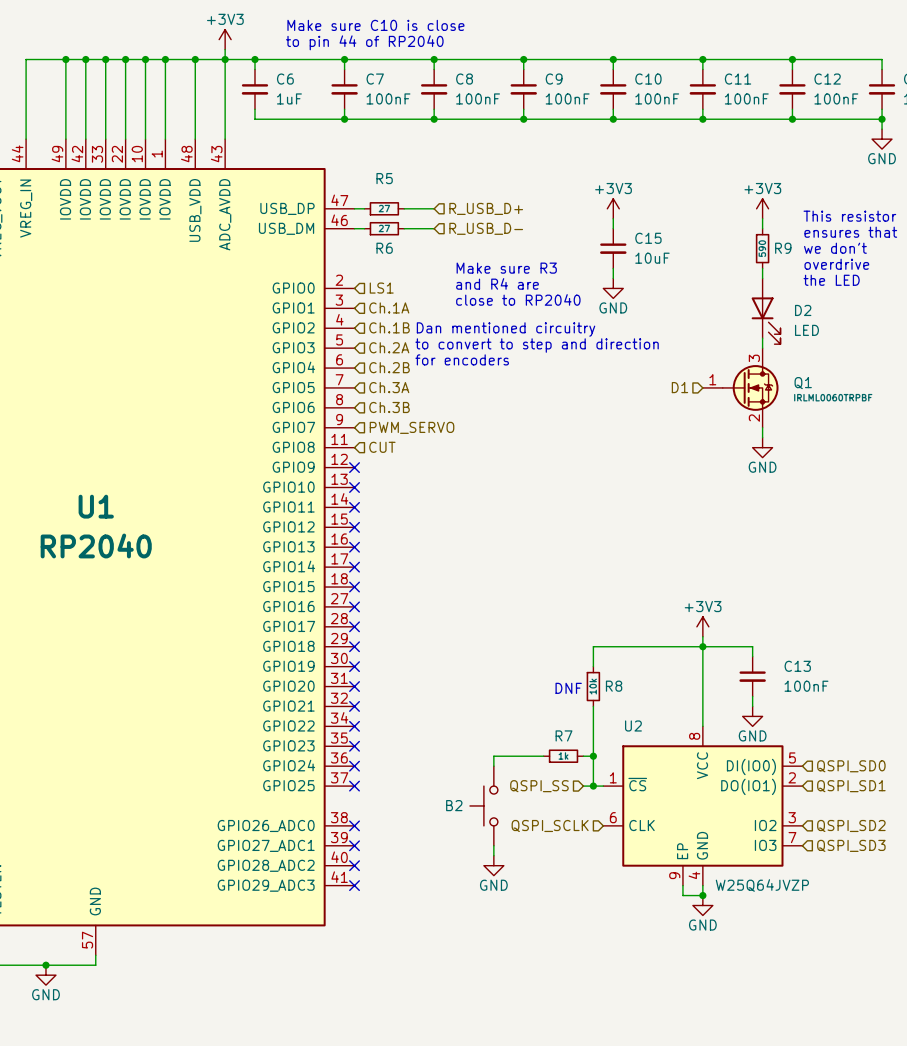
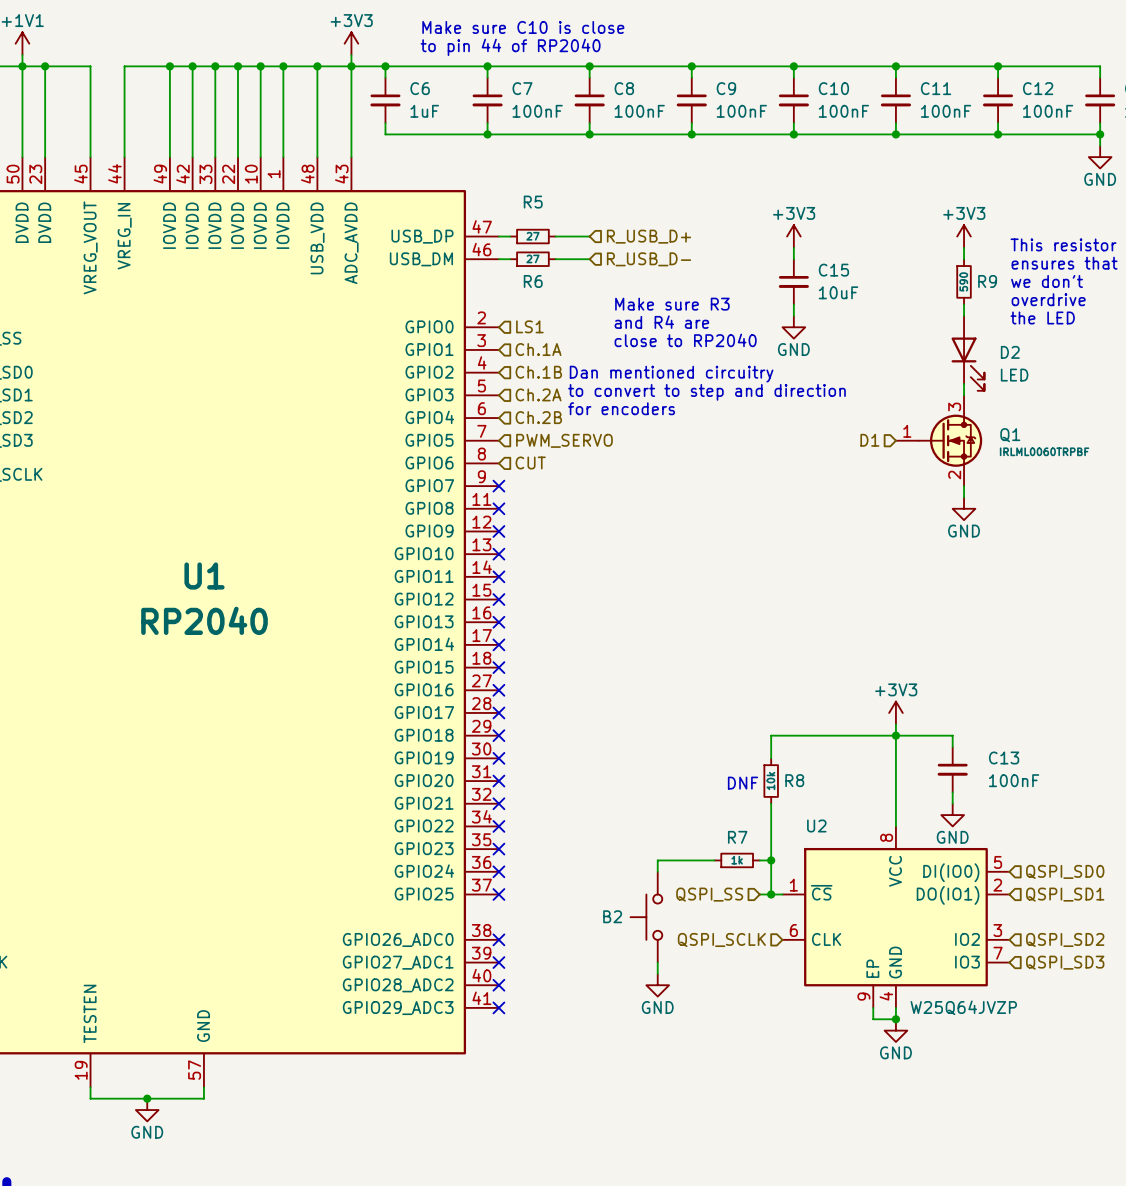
hierarchical label: Ch.3A (389, 387) -> PWM_SERVO (564, 440)
hierarchical label: Ch.3B (389, 407) -> CUT (530, 462)
no-connect mark: none -> (498, 486)
hierarchical label: PWM_SERVO (412, 427) -> none
no-connect mark: none -> (498, 508)
hierarchical label: CUT (382, 447) -> none

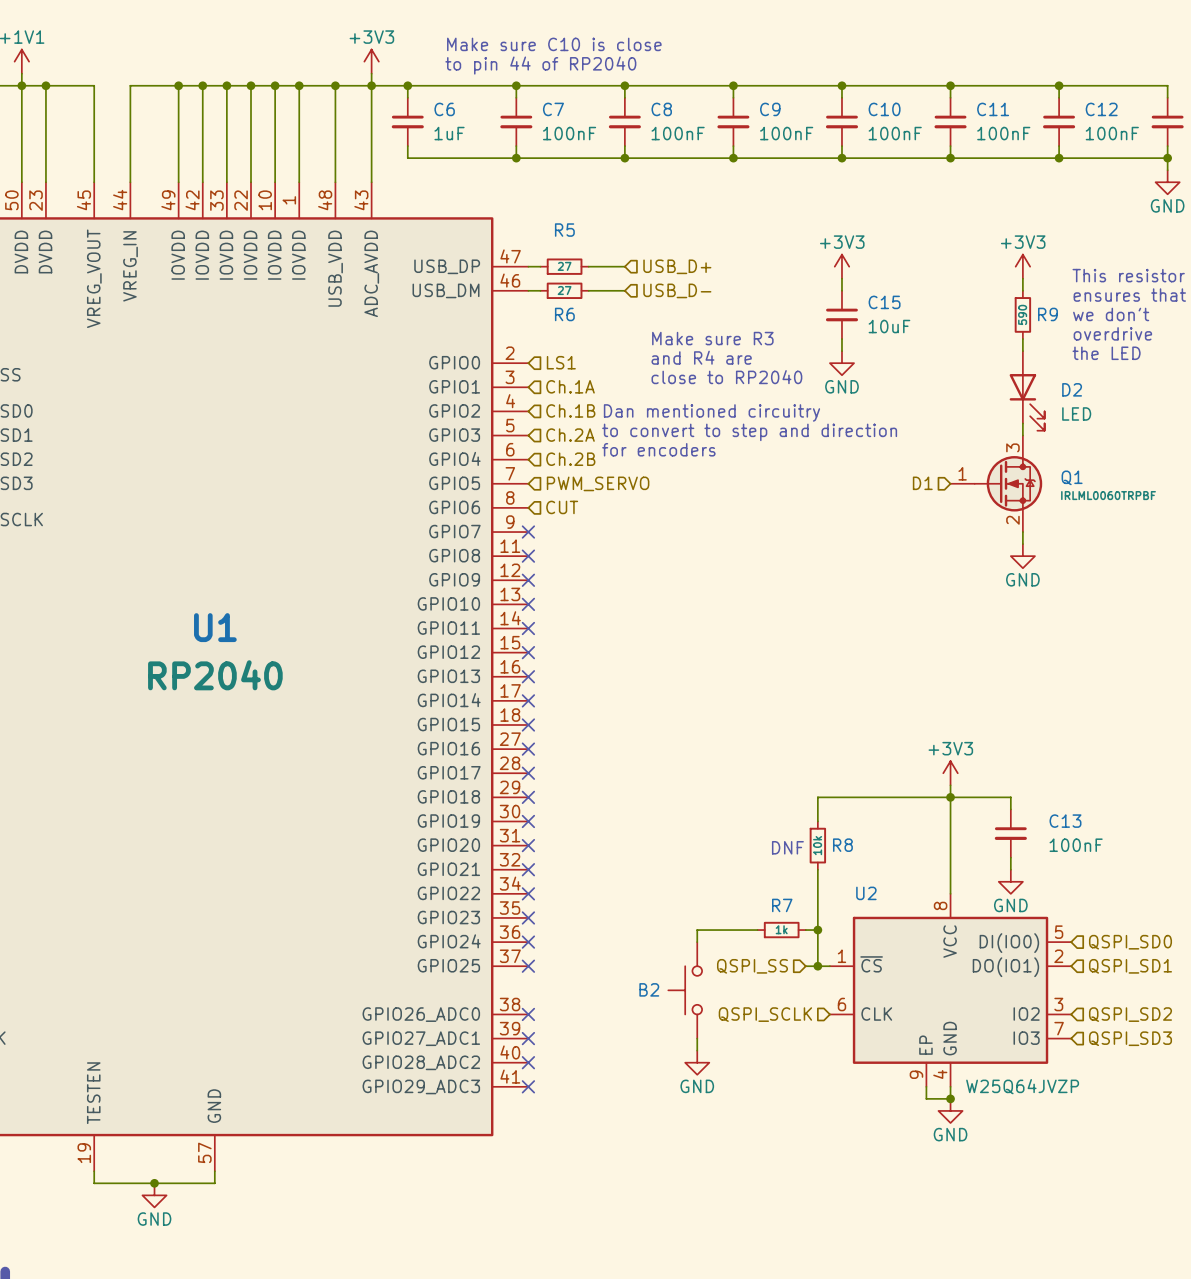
hierarchical label: R_USB_D+ (648, 236) -> USB_D+ (677, 266)
hierarchical label: R_USB_D- (648, 259) -> USB_D- (677, 290)

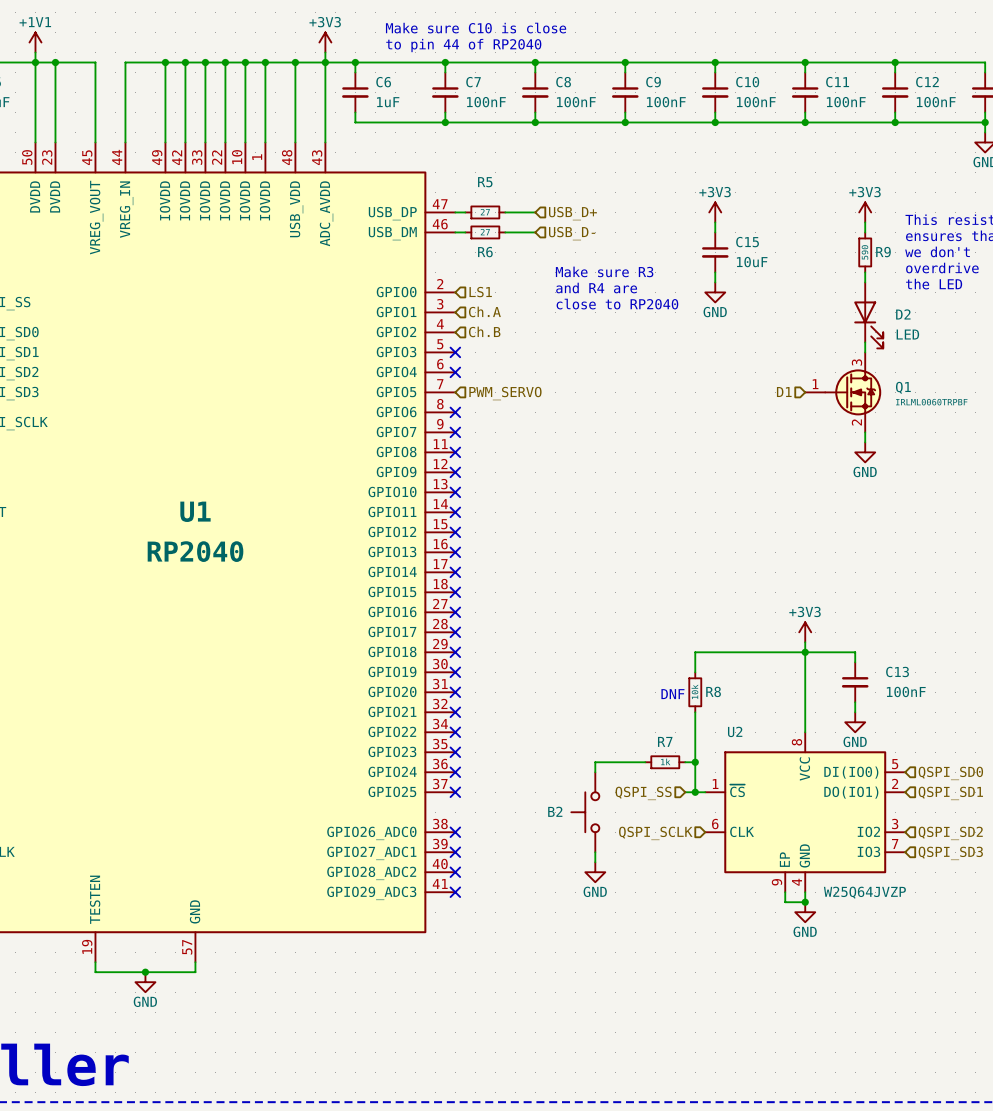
hierarchical label: Ch.1A (570, 386) -> Ch.A (484, 311)
hierarchical label: Ch.1B (570, 410) -> Ch.B (484, 331)
text: Dan mentioned circuitry (711, 412) -> none
text: to convert to step and direction (749, 432) -> none
no-connect mark: none -> (455, 352)
hierarchical label: Ch.2A (570, 435) -> none
text: for encoders (658, 449) -> none
no-connect mark: none -> (455, 372)
hierarchical label: Ch.2B (570, 459) -> none
no-connect mark: none -> (455, 412)
hierarchical label: CUT (562, 507) -> none

